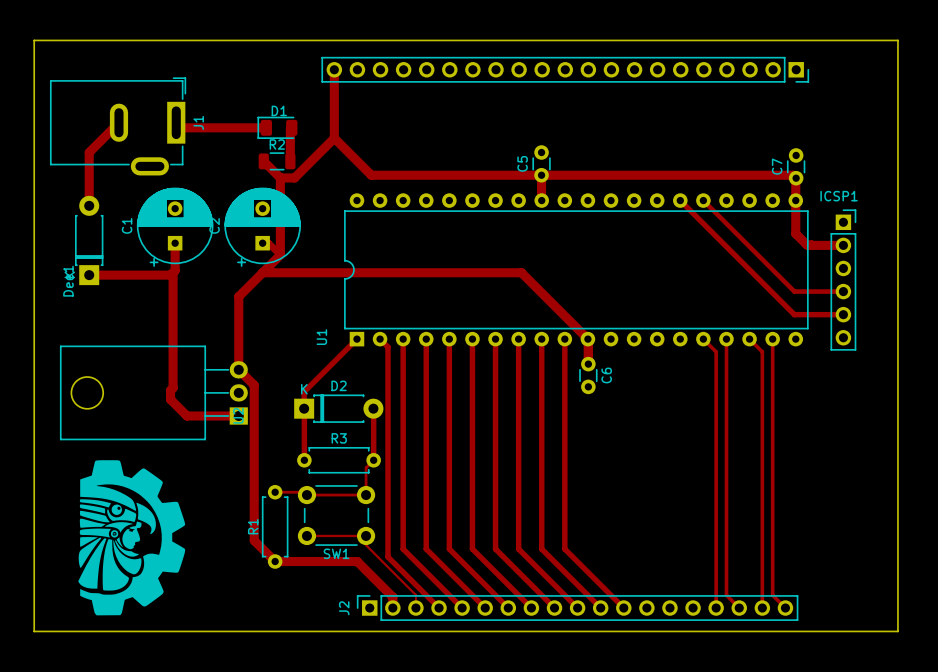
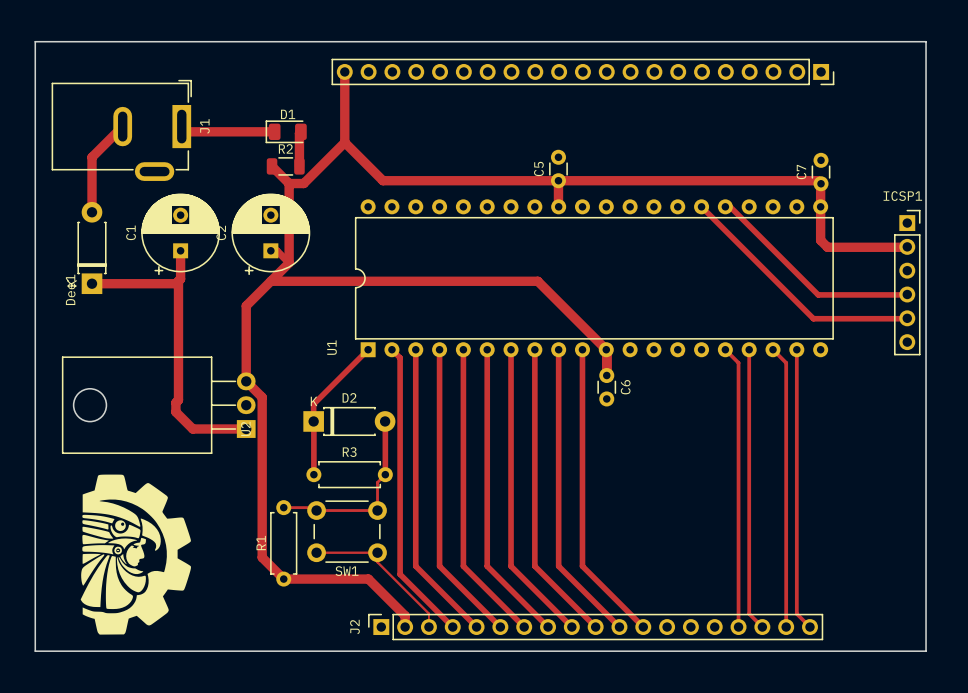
track: (703, 200) (794, 291) (843, 291) -> none
track: none -> (730, 206) (818, 294) (906, 294)
track: (795, 233) (807, 245) (843, 245) -> (820, 240) (827, 247) (906, 247)
ICSP1 position: (843, 280) -> (907, 282)
track: (788, 309) (794, 314) (843, 314) -> (813, 318) (906, 318)

